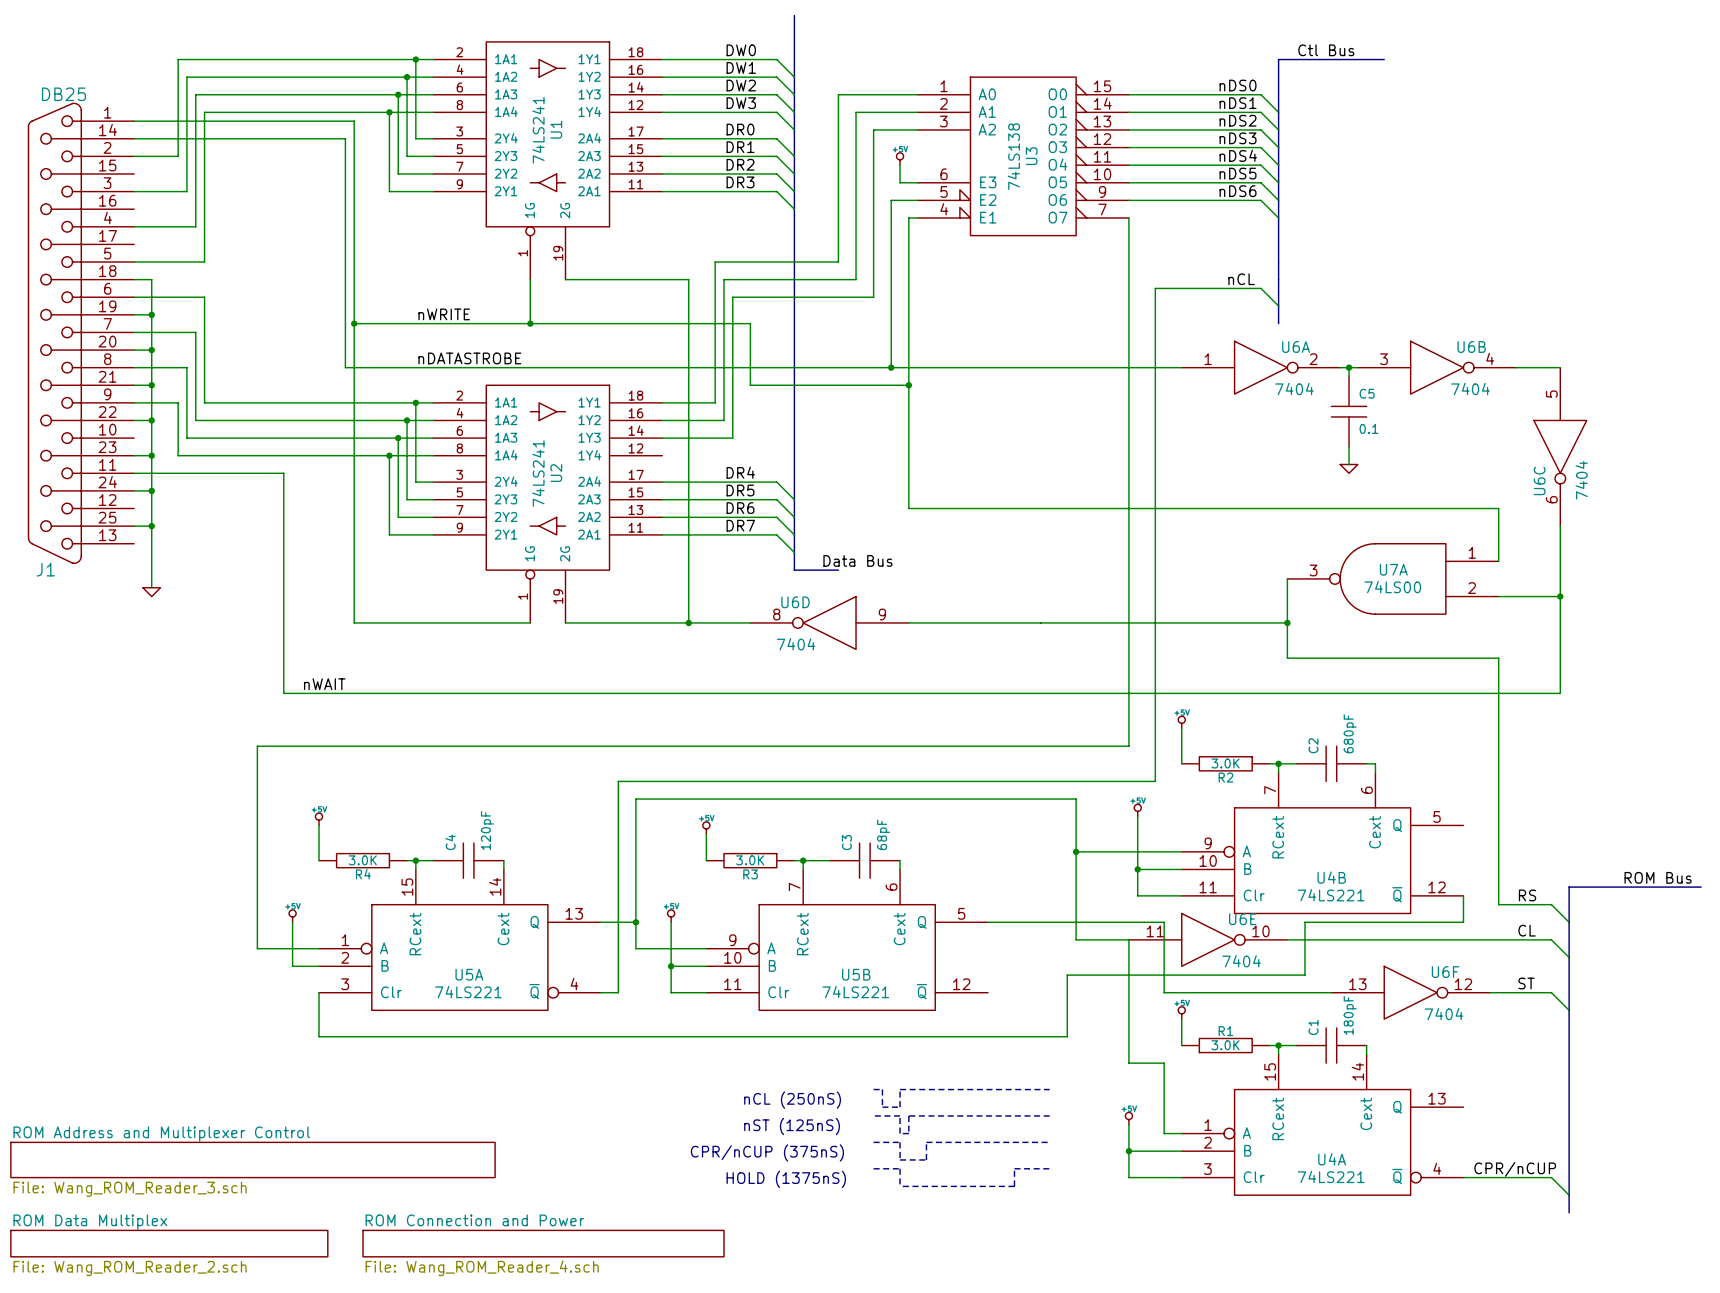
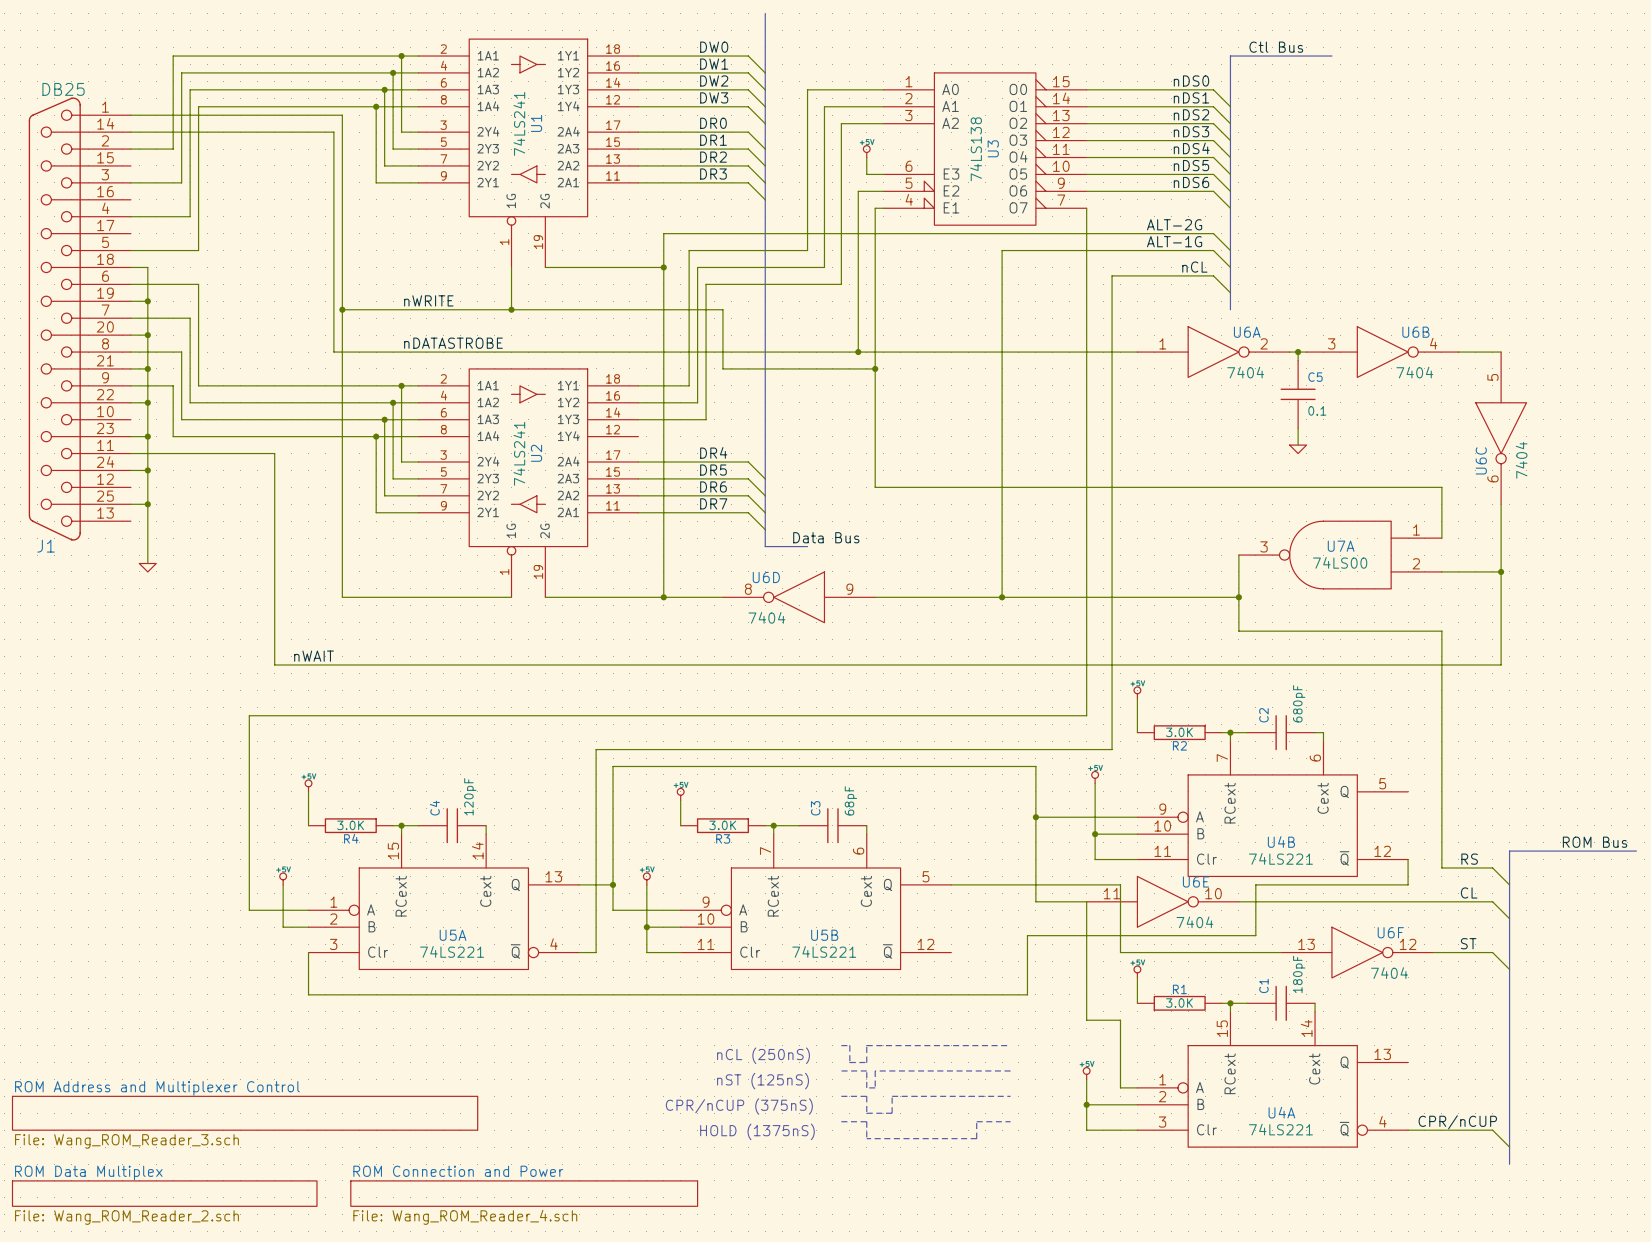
label: none -> ALT-2G (1174, 224)
label: none -> ALT-1G (1174, 241)
wire: none -> (1230, 250) (1213, 233) (663, 233) (663, 267)
junction: none -> (663, 267)
wire: none -> (1230, 267) (1213, 250) (1002, 250) (1002, 597)
junction: none -> (1002, 597)

